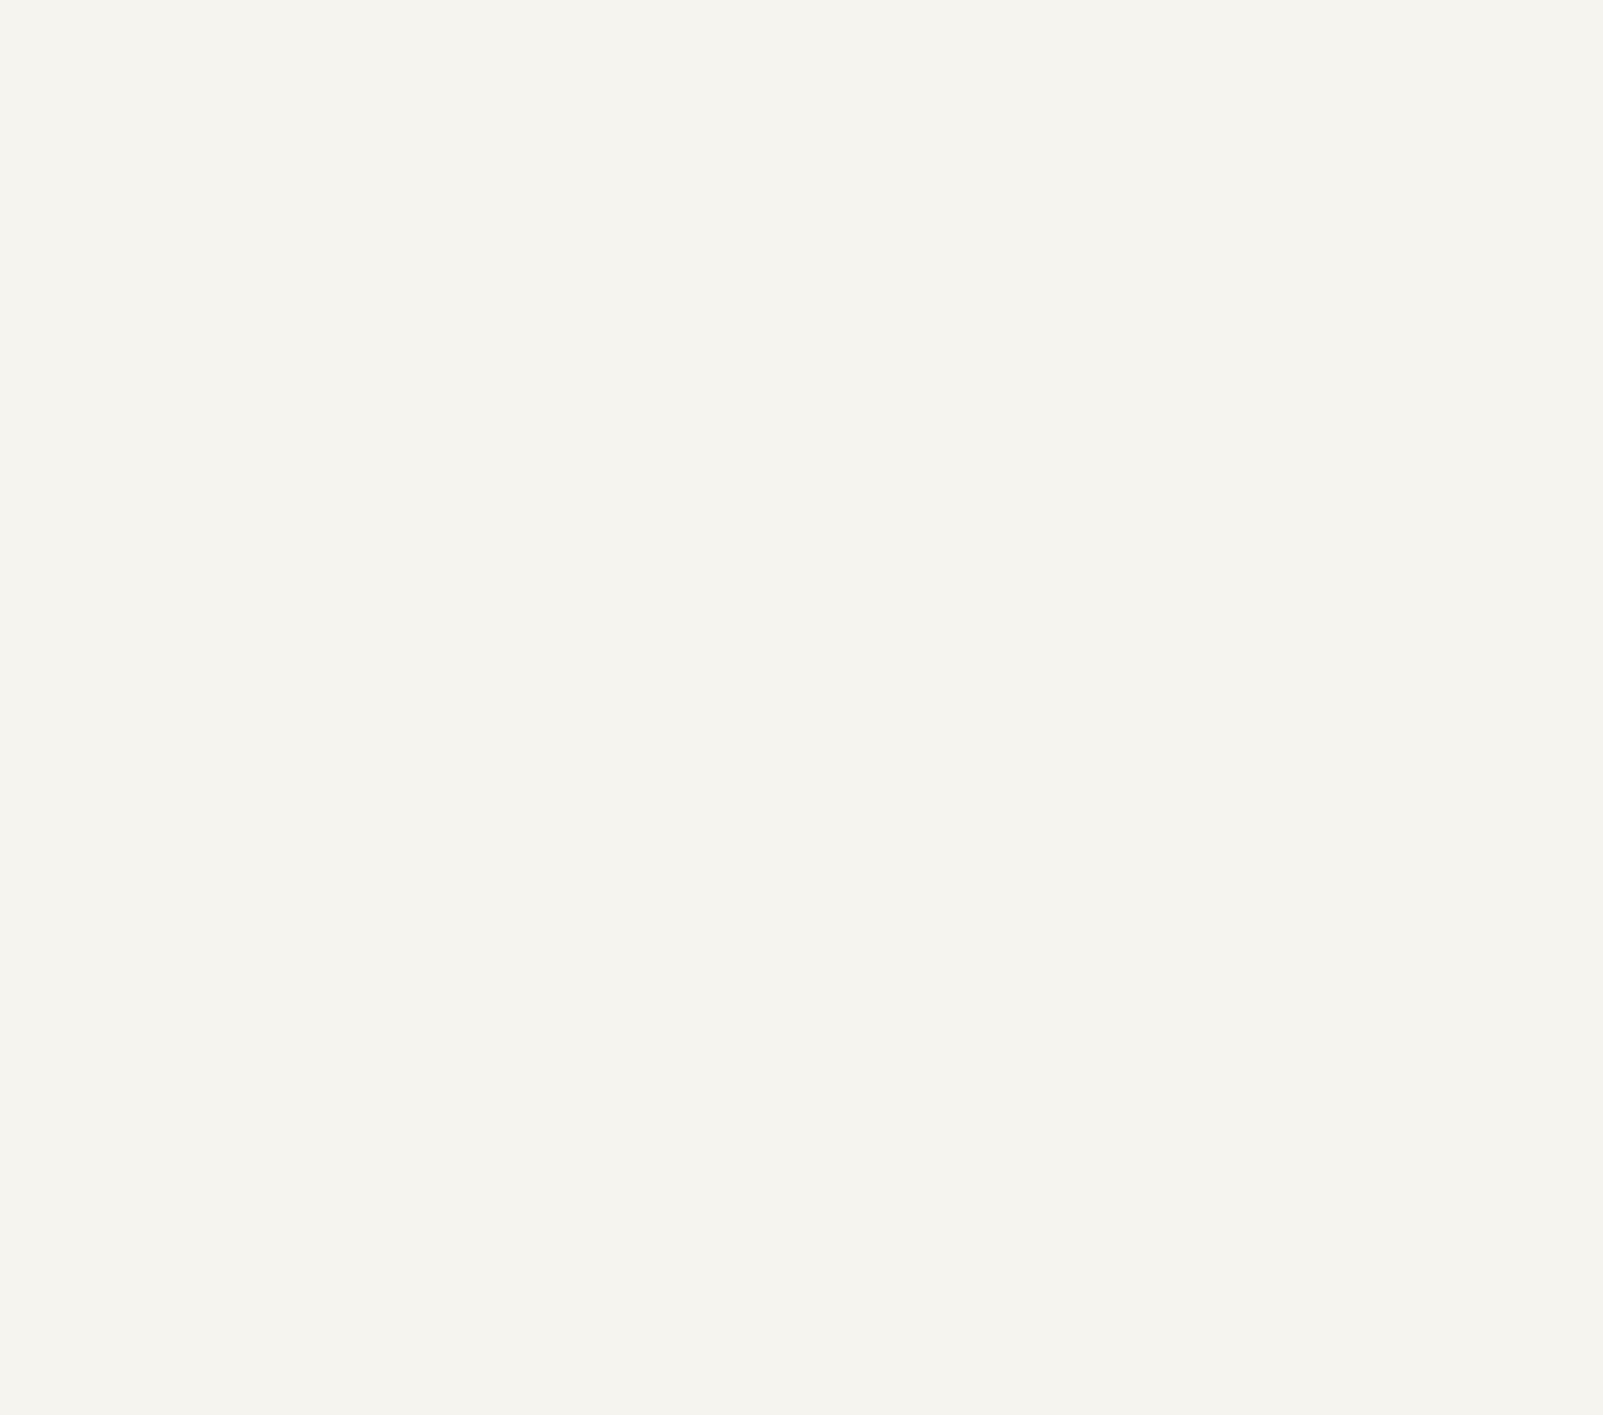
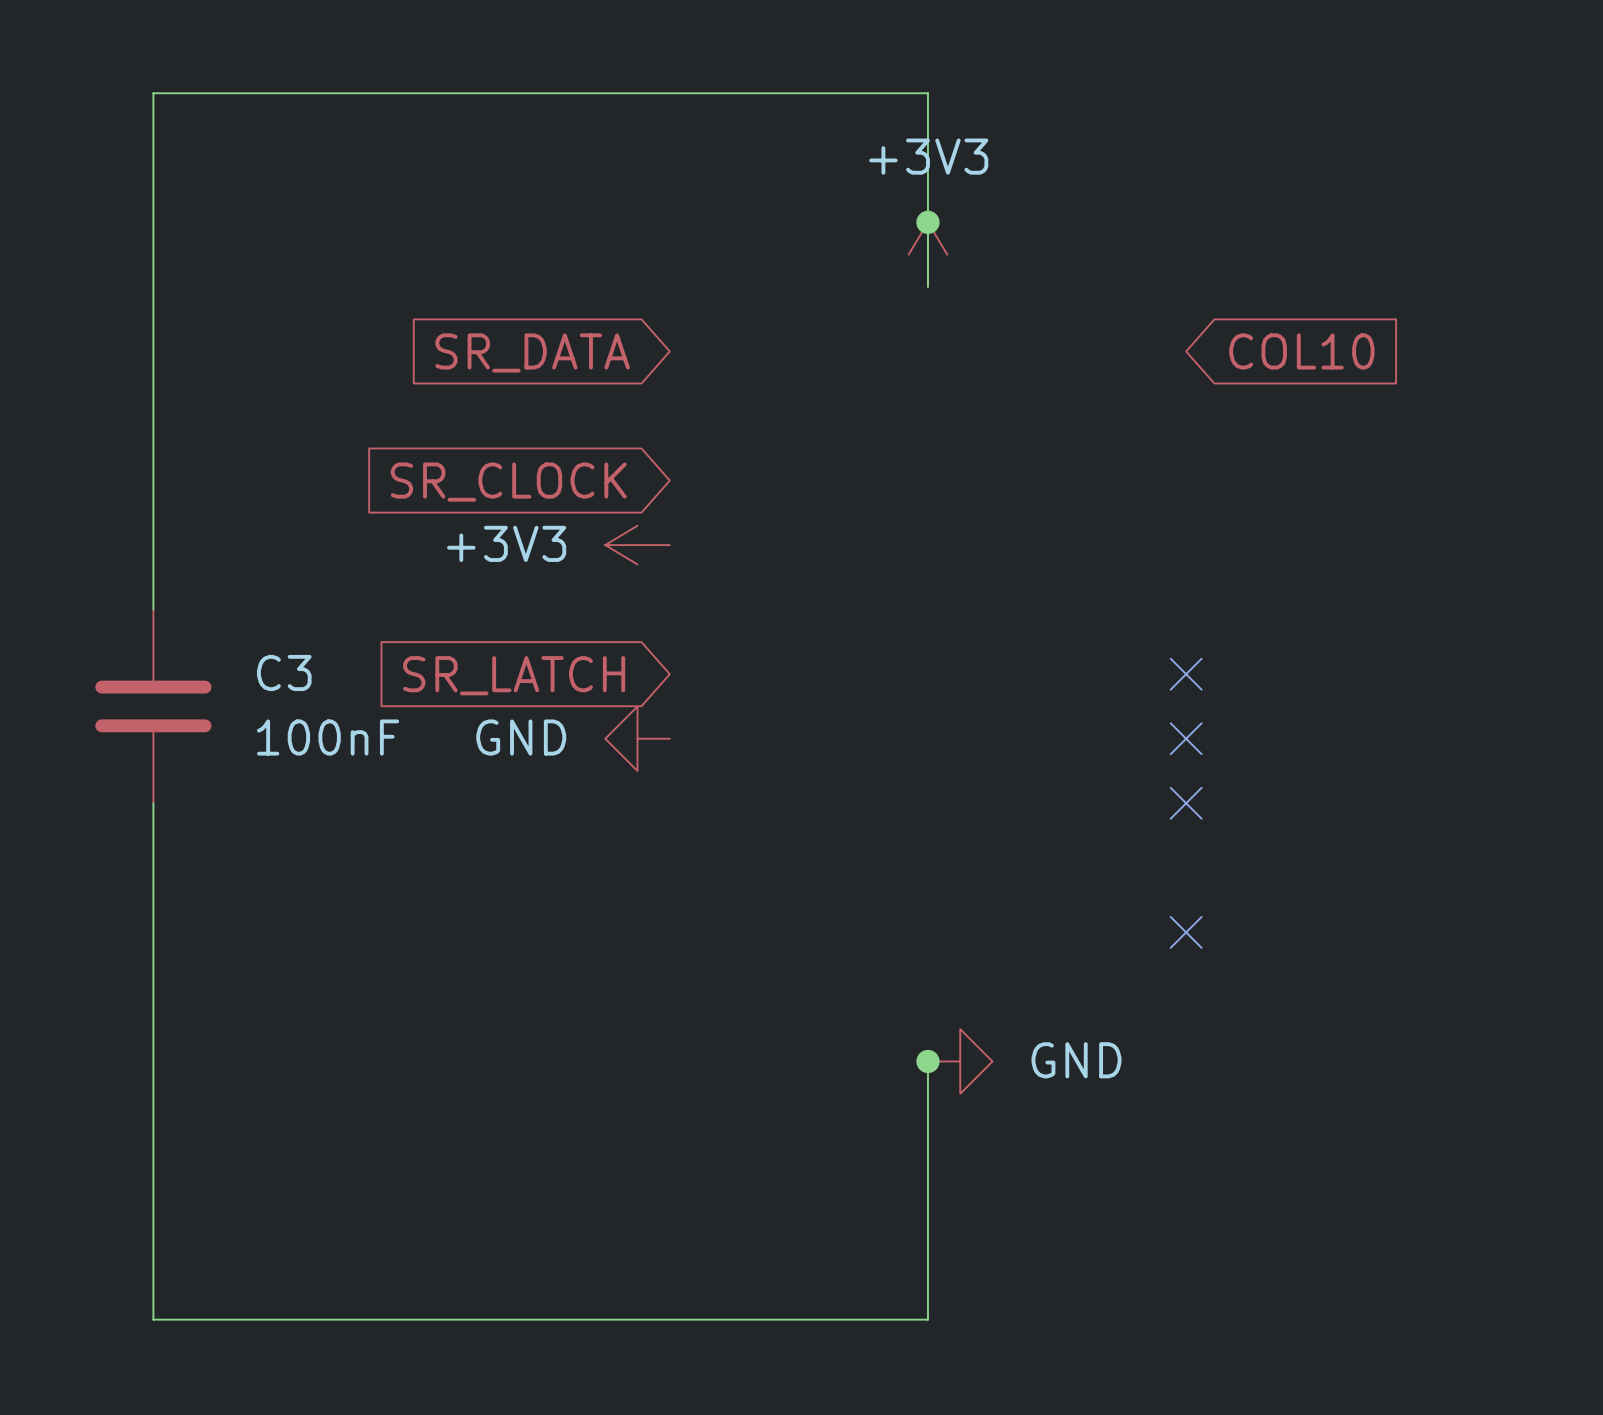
junction: none -> (927, 222)
power symbol: none -> +3V3 (927, 254)
wire: none -> (927, 286) (927, 93) (153, 93) (153, 609)
global label: none -> COL10 (1301, 351)
global label: none -> SR_DATA (532, 352)
global label: none -> SR_CLOCK (508, 482)
power symbol: none -> +3V3 (637, 545)
no-connect mark: none -> (1186, 674)
global label: none -> SR_LATCH (514, 675)
C3: none -> 100nF (153, 706)
power symbol: none -> GND (637, 738)
no-connect mark: none -> (1186, 738)
wire: none -> (153, 803) (153, 1319) (927, 1319) (927, 1061)
no-connect mark: none -> (1186, 803)
no-connect mark: none -> (1186, 932)
junction: none -> (927, 1061)
power symbol: none -> GND (960, 1061)

